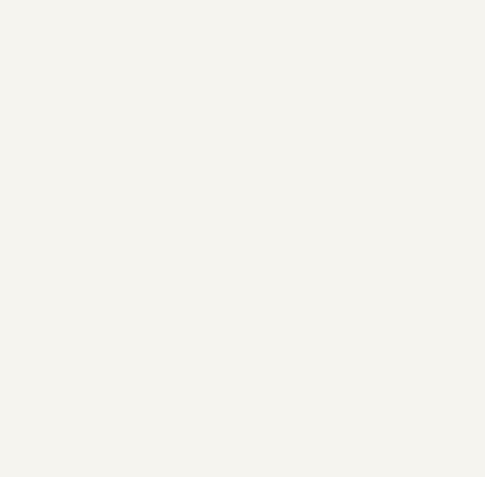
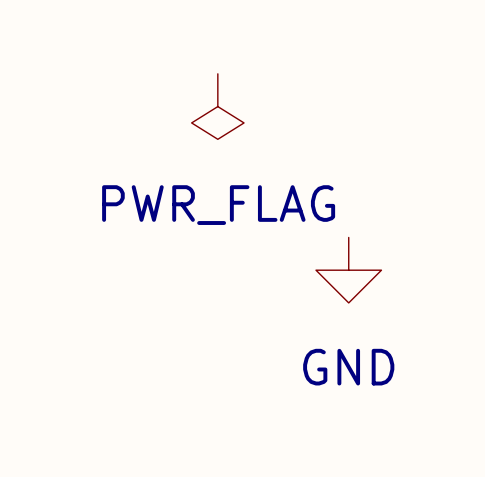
power symbol: none -> PWR_FLAG (217, 106)
power symbol: none -> GND (348, 270)

